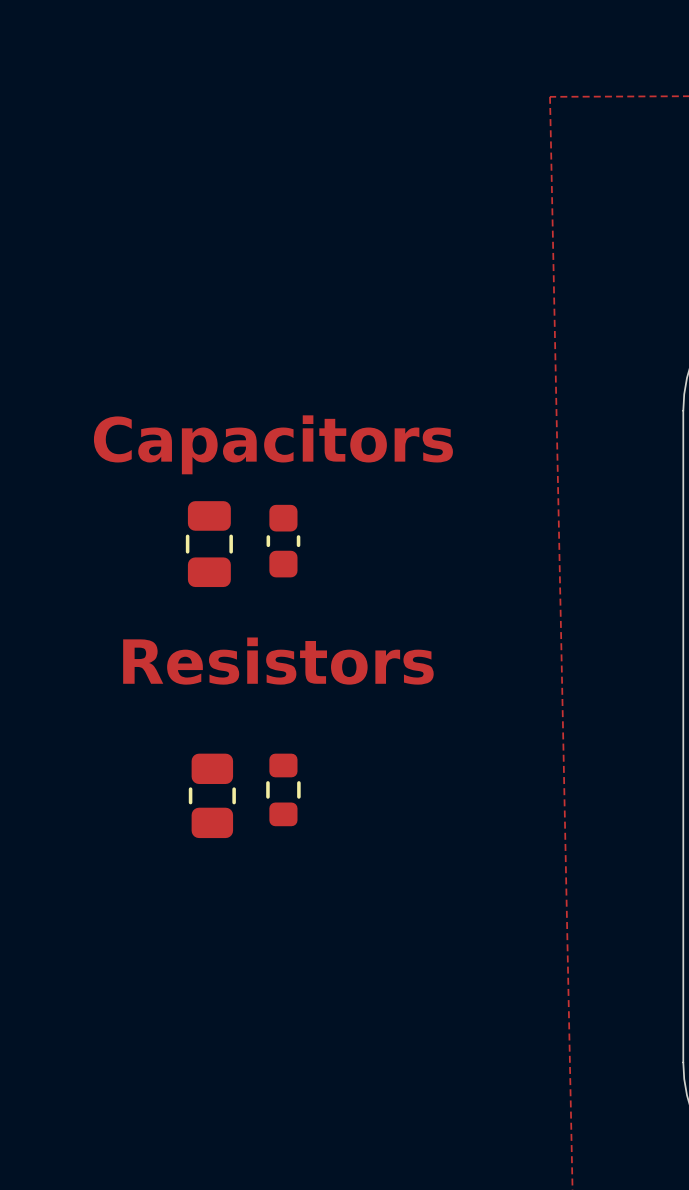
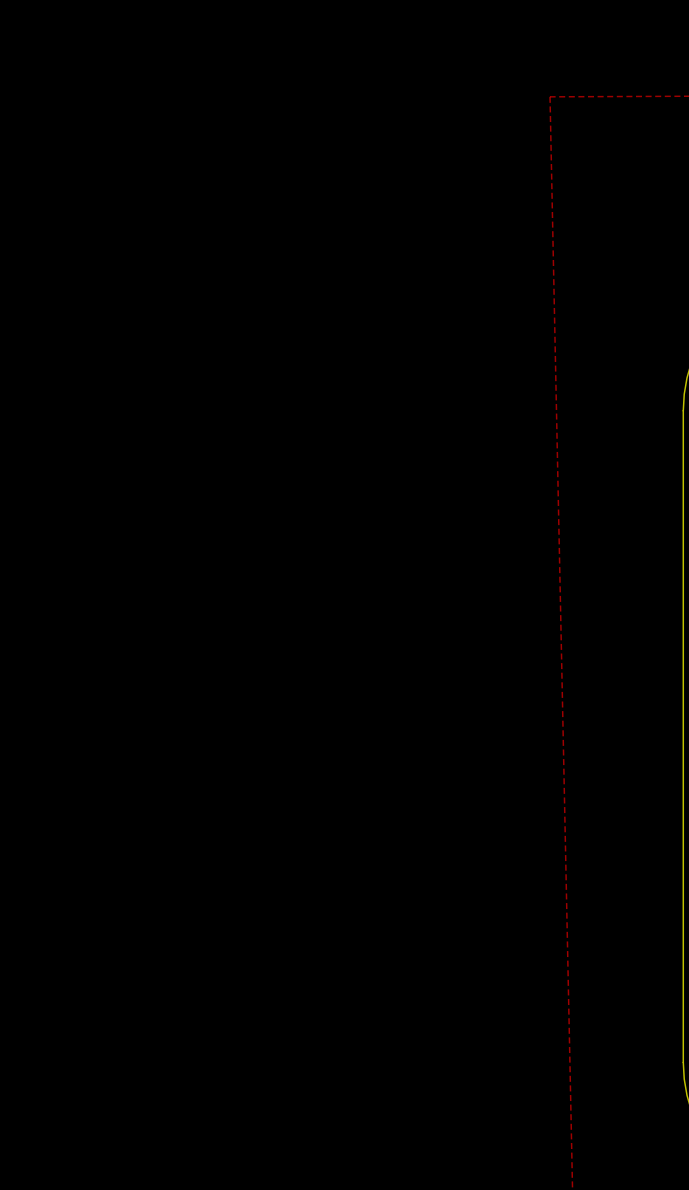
text: Capacitors (273, 444) -> none
part: (283, 541) -> none
part: (209, 544) -> none
text: Resistors (278, 661) -> none
part: (283, 789) -> none
part: (212, 795) -> none

